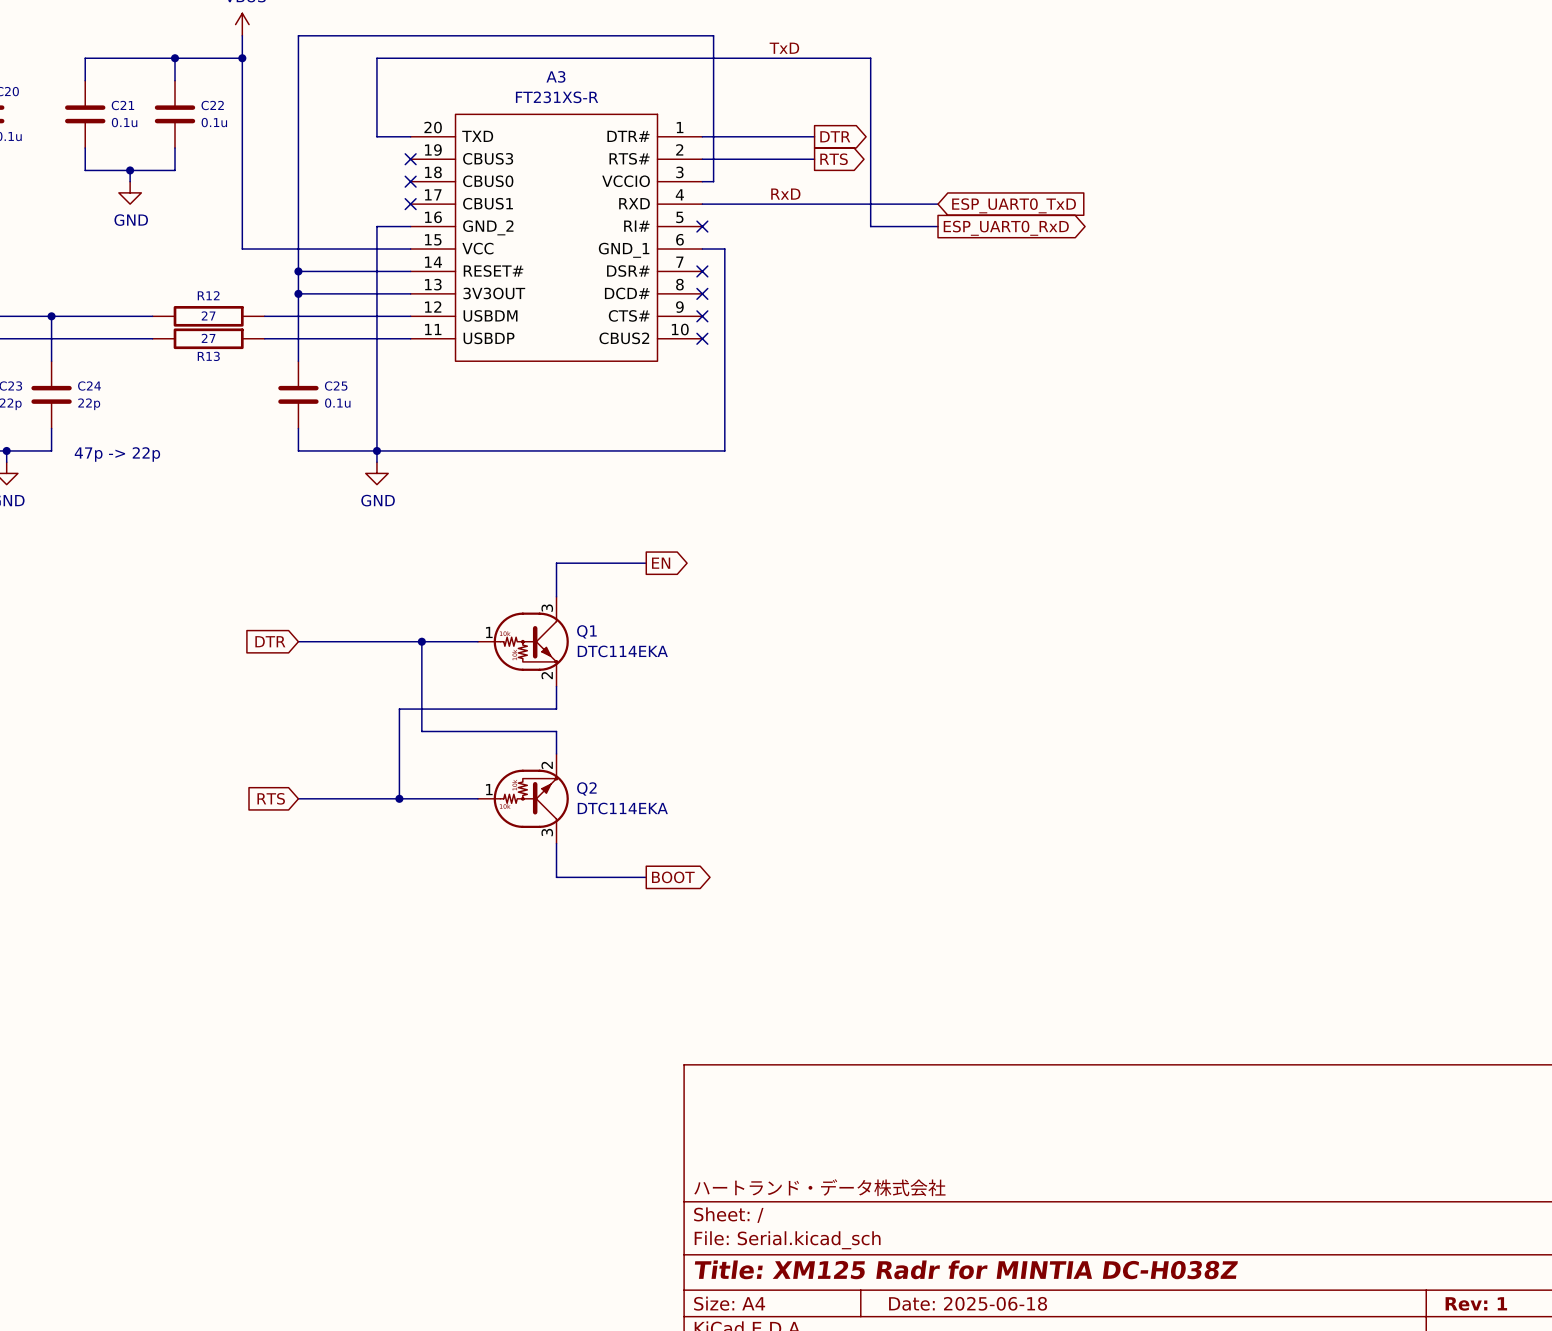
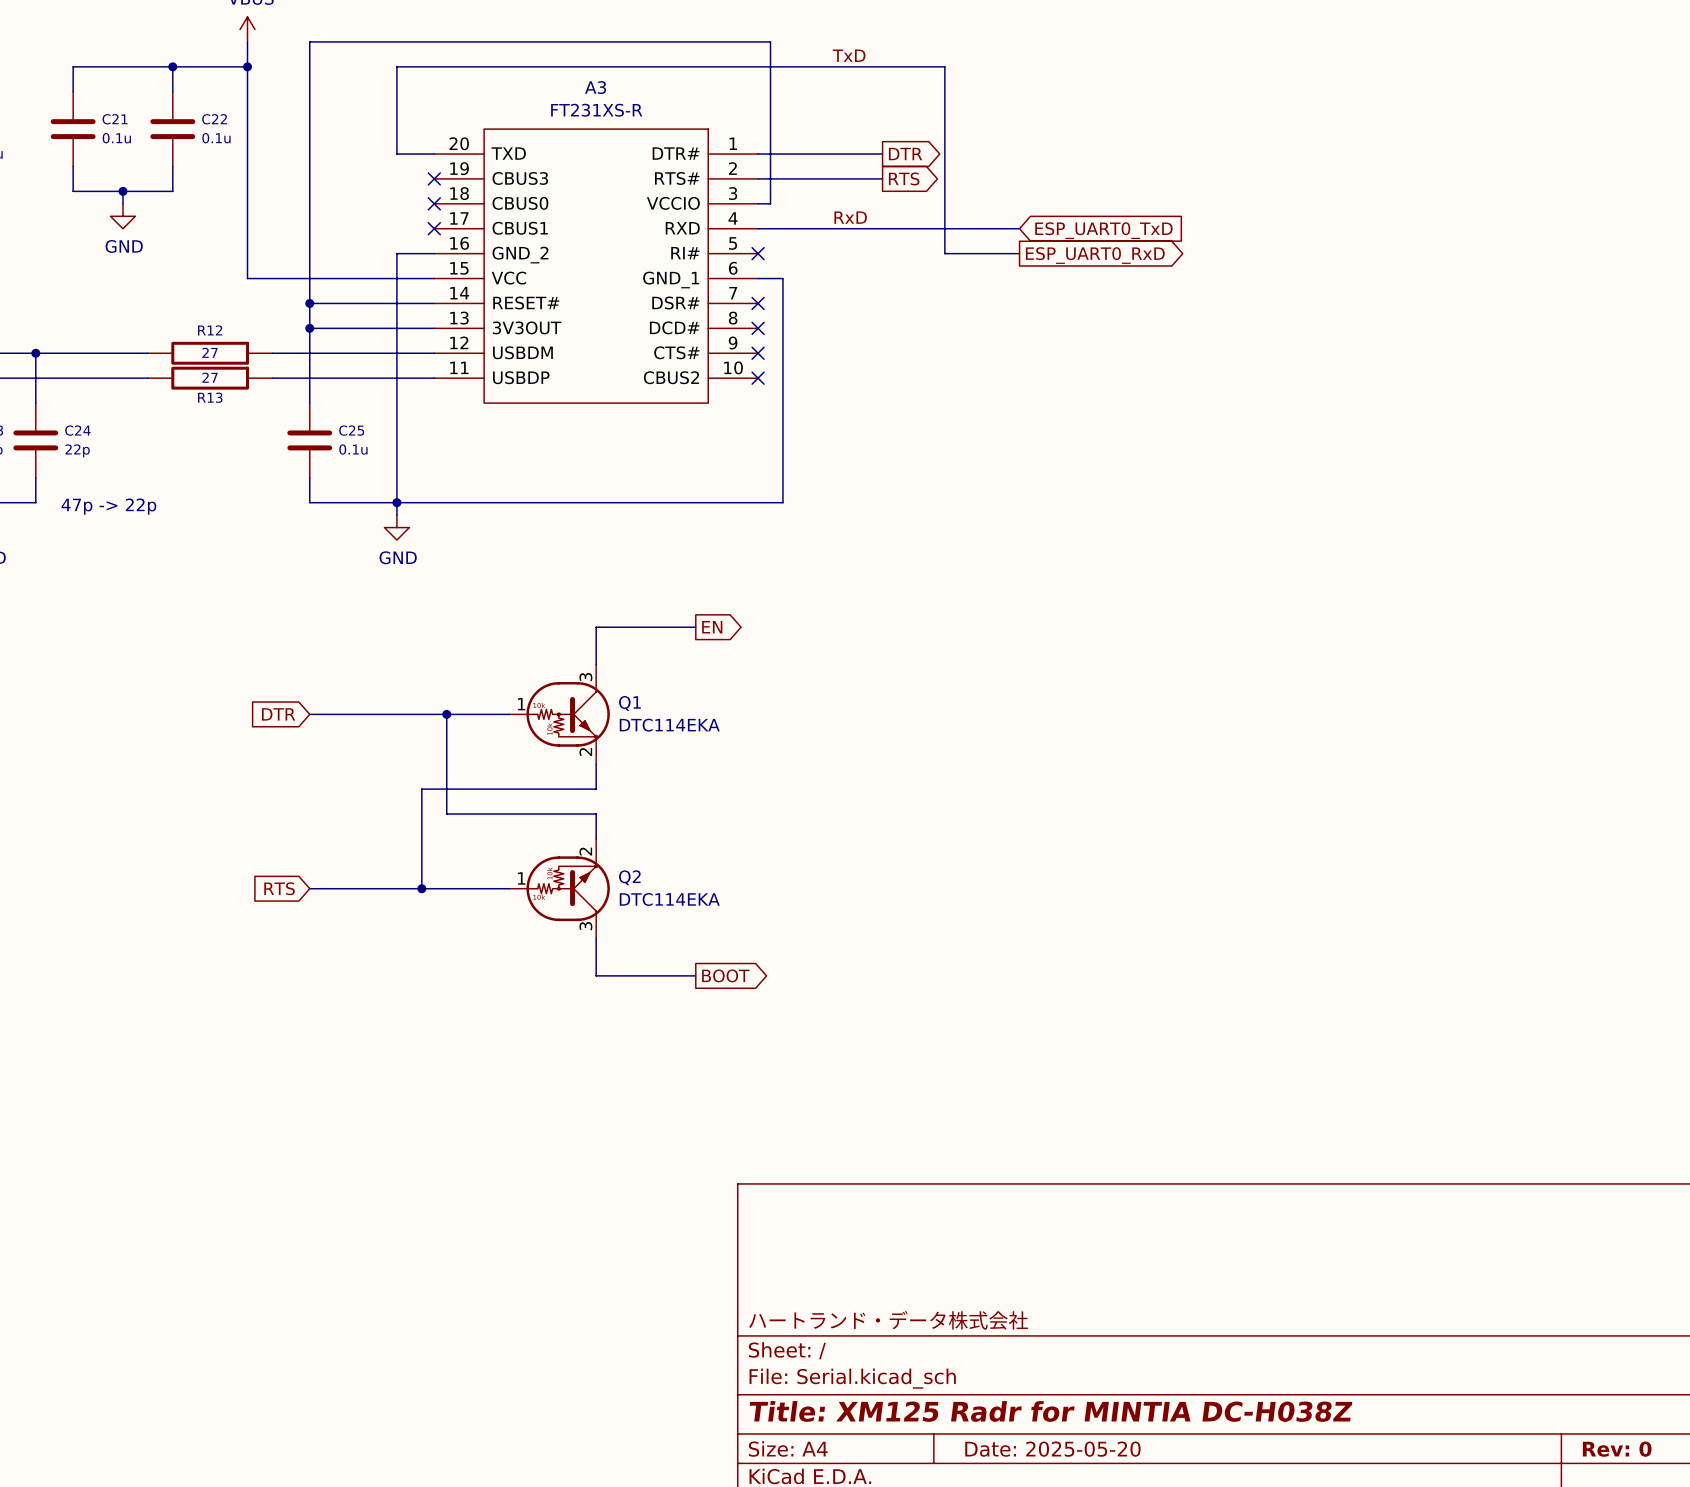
title block: Date: 2025-06-18 (968, 1303) -> Date: 2025-05-20 (1052, 1449)
title block: Rev: 1 (1476, 1303) -> Rev: 0 (1617, 1449)

